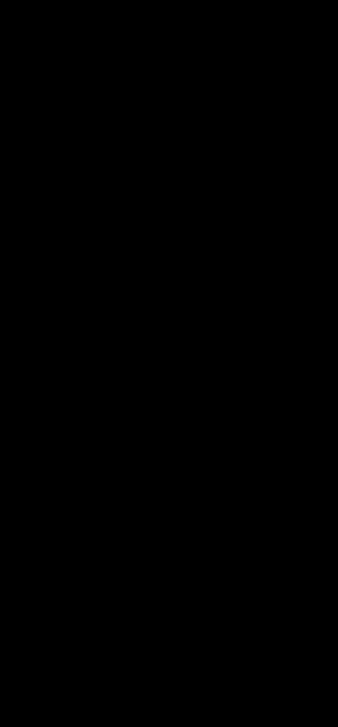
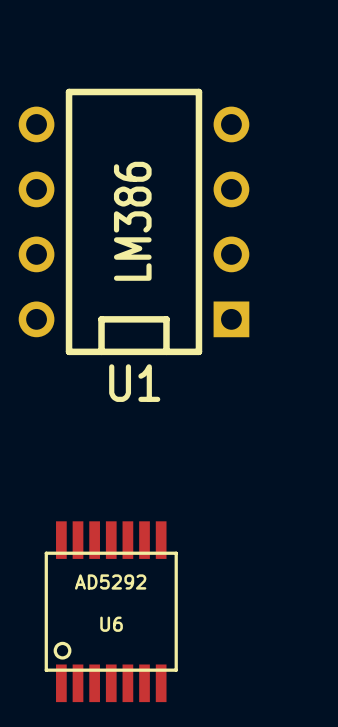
U1: none -> LM386 (134, 221)
U6: none -> AD5292 (111, 611)

